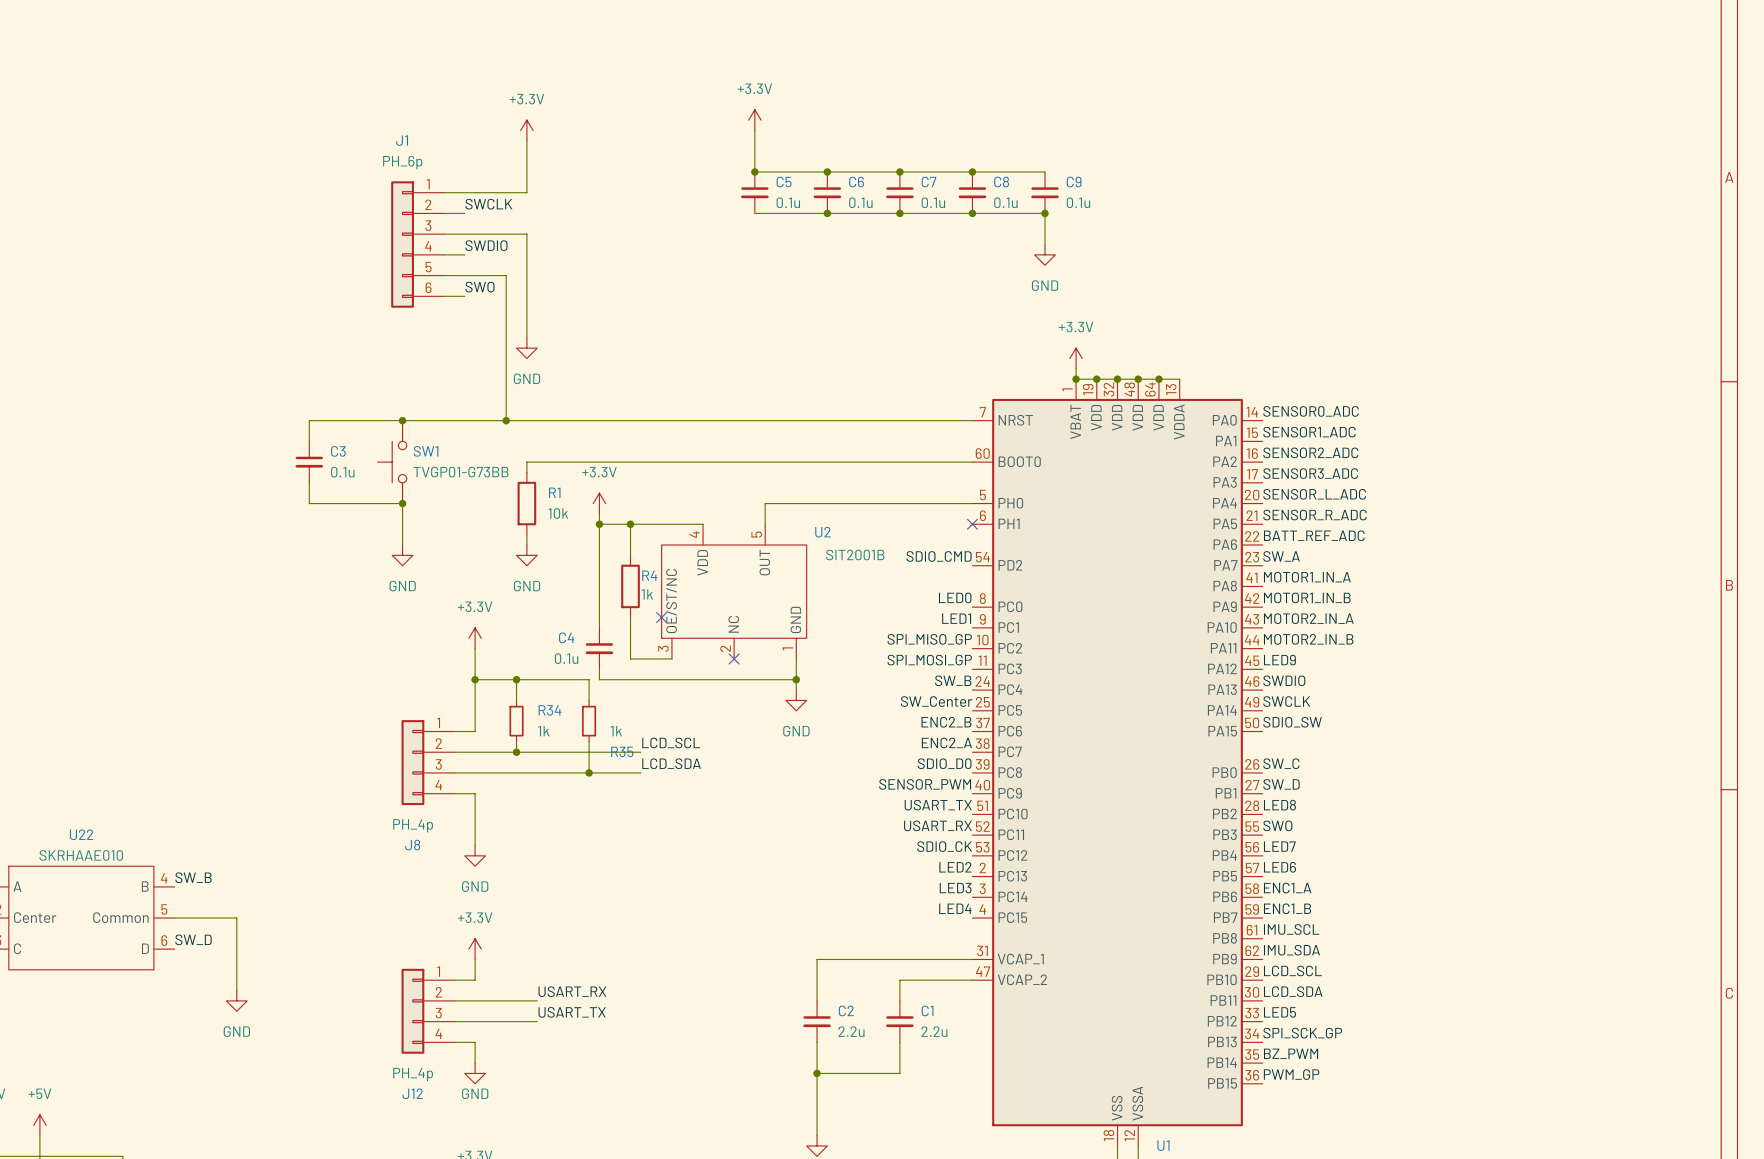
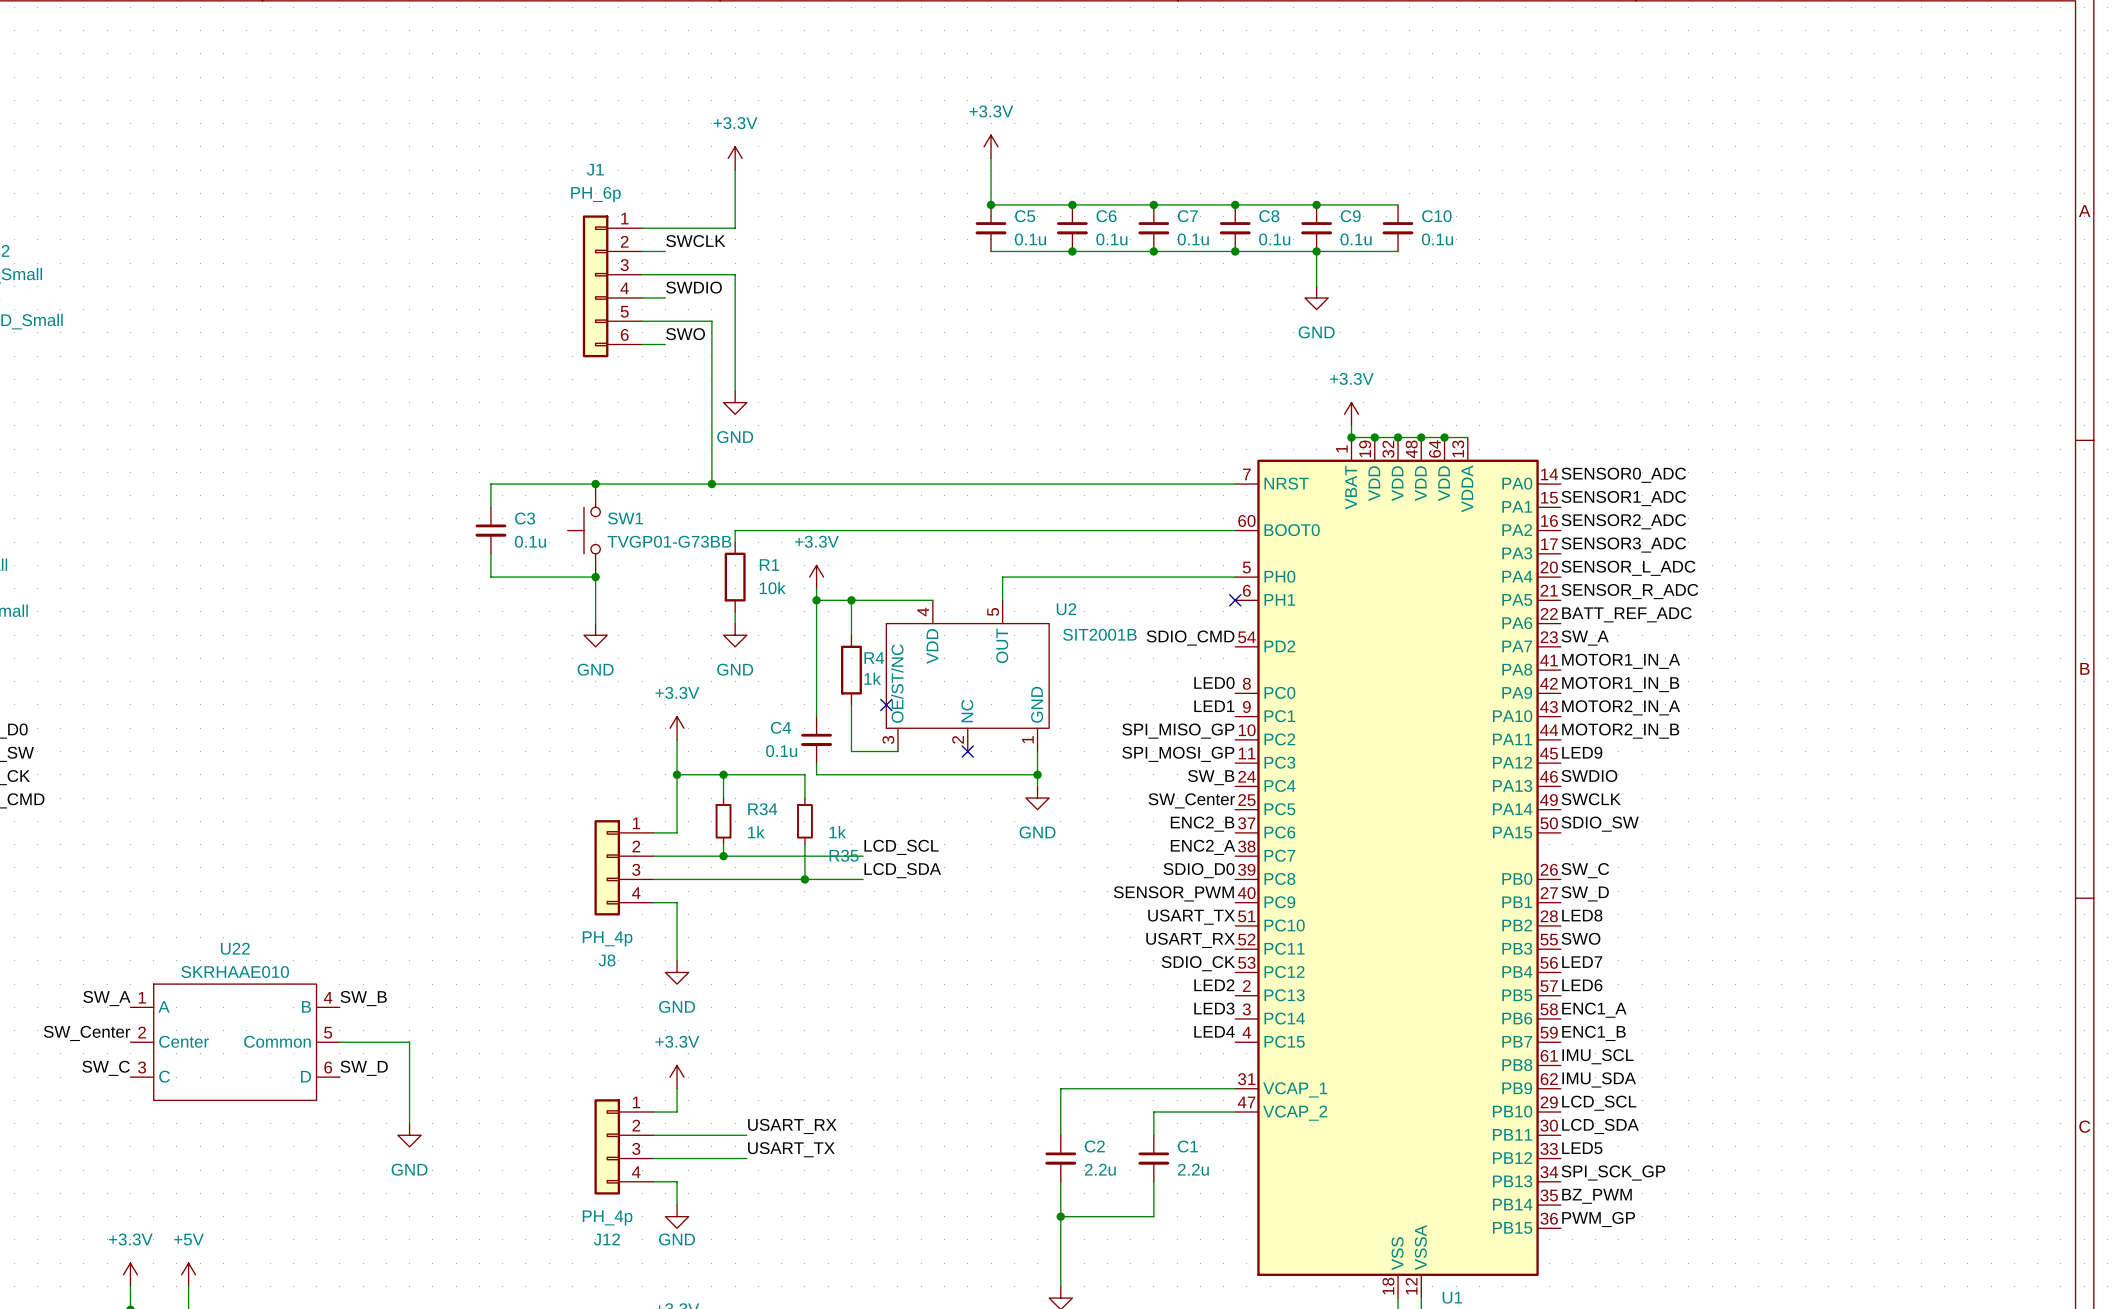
wire: none -> (1316, 204) (1398, 204)
junction: none -> (1316, 204)
C10: none -> 0.1u (1398, 228)
wire: none -> (1316, 251) (1398, 251)

